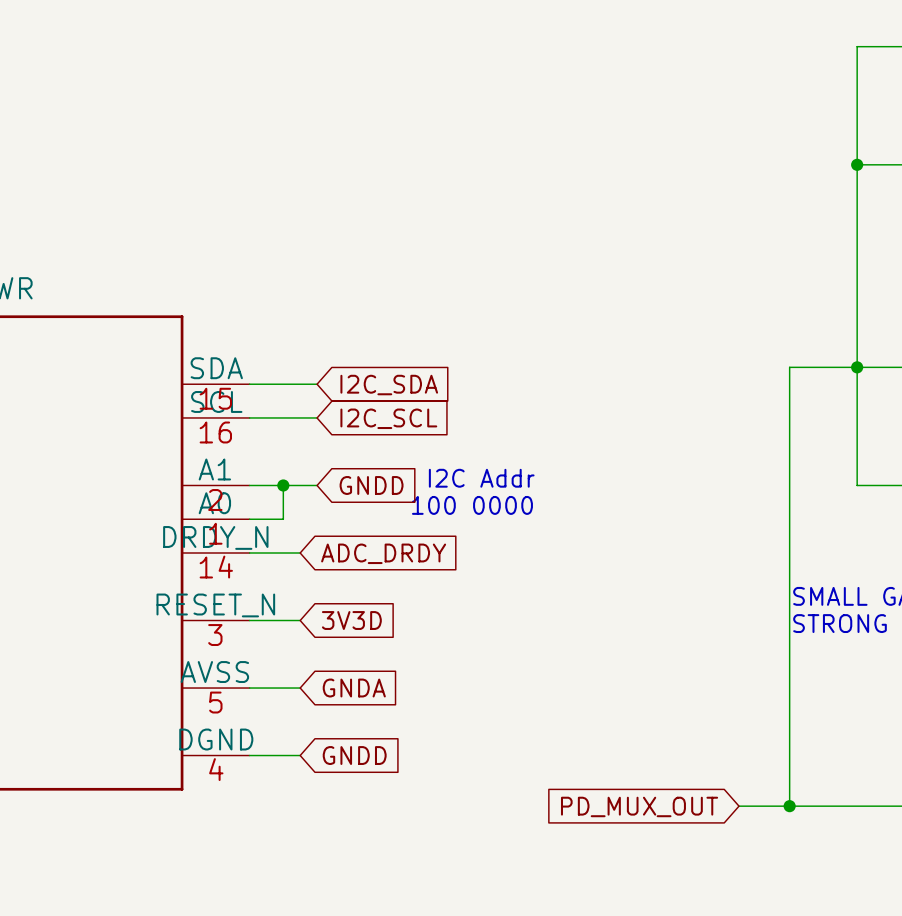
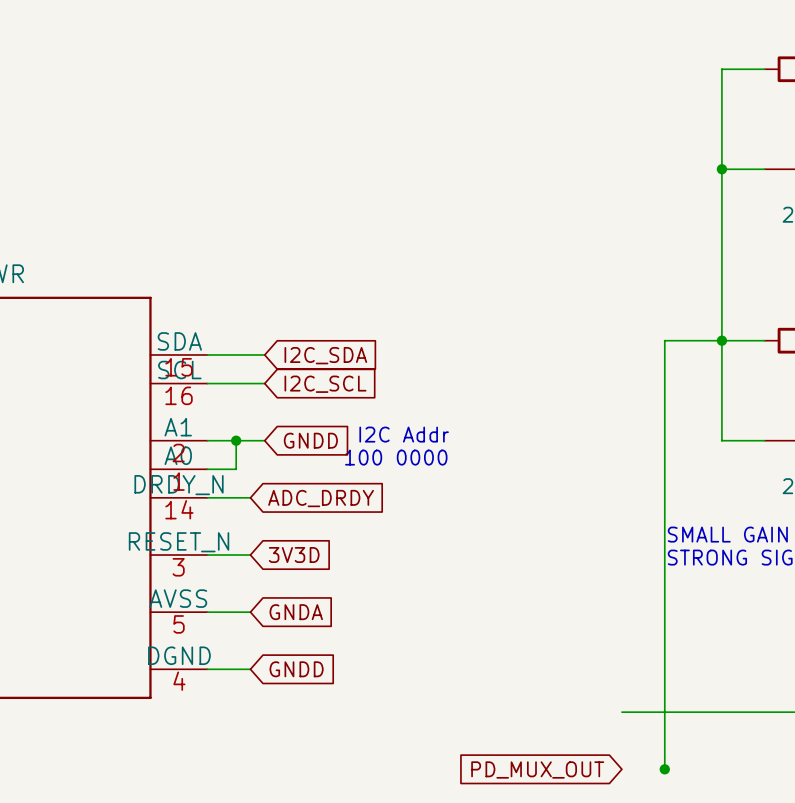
global label position: PD_MUX_OUT (639, 806) -> PD_MUX_OUT (537, 769)
wire: none -> (664, 712) (664, 769)
junction position: (789, 806) -> (664, 769)

